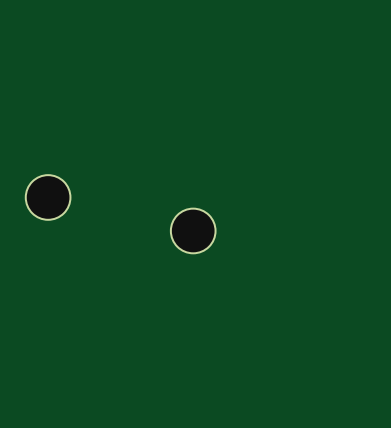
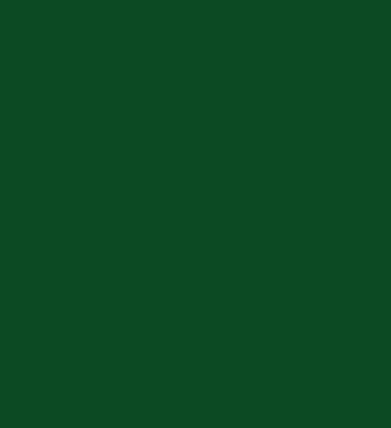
part: (120, 214) -> none

